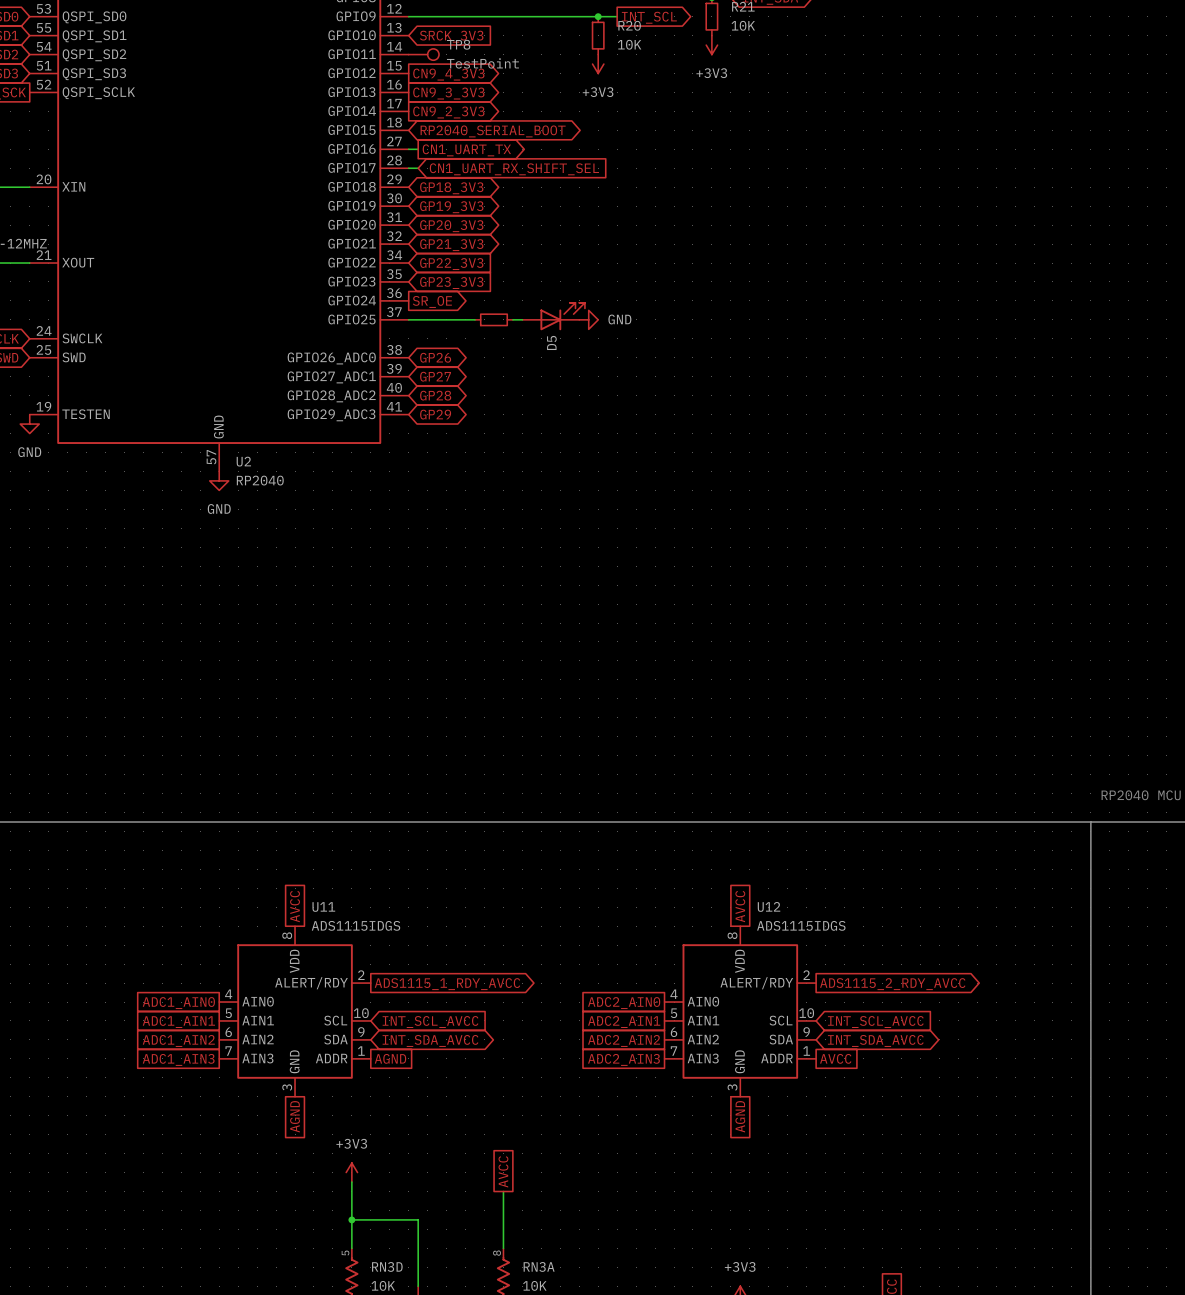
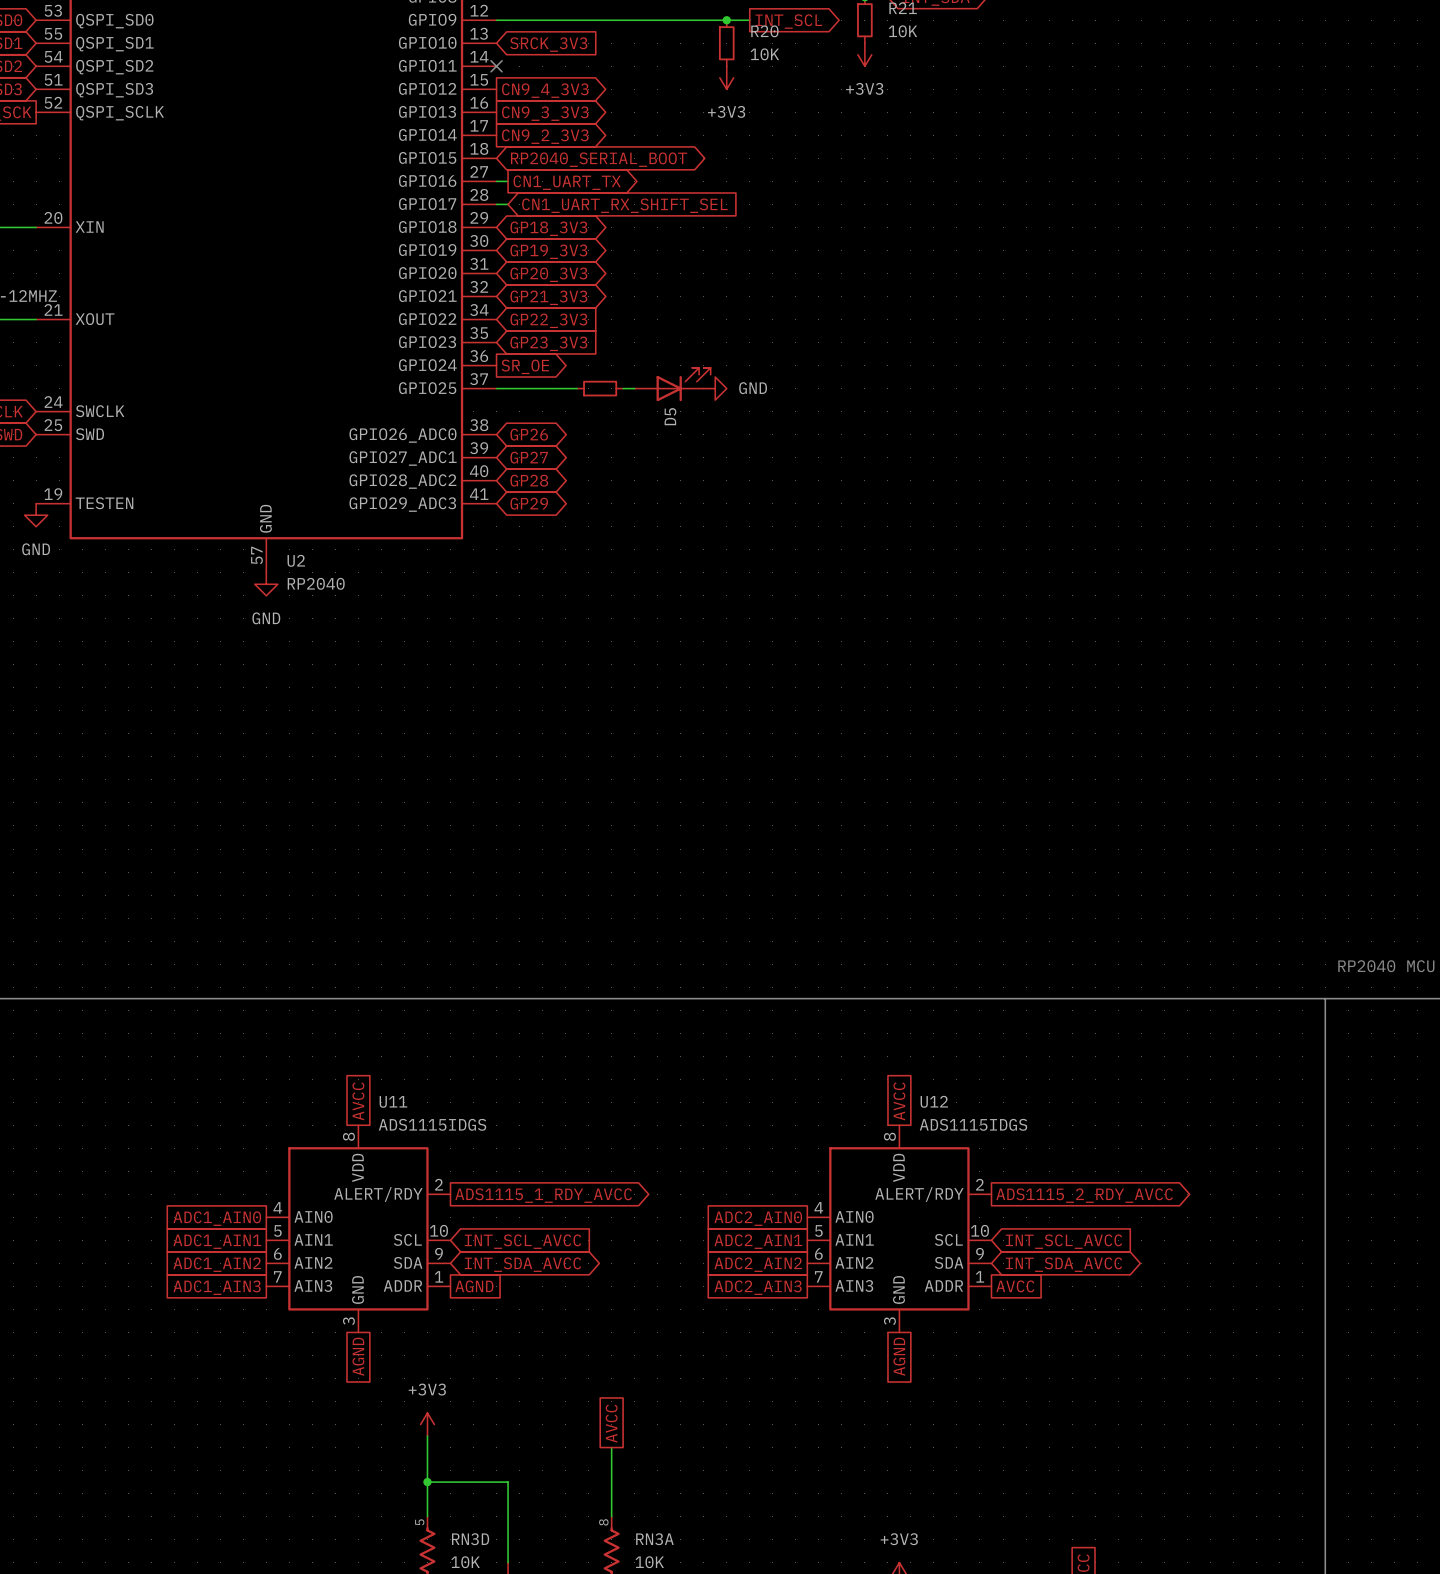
no-connect mark: none -> (496, 66)
TP8: TestPoint (423, 54) -> none

